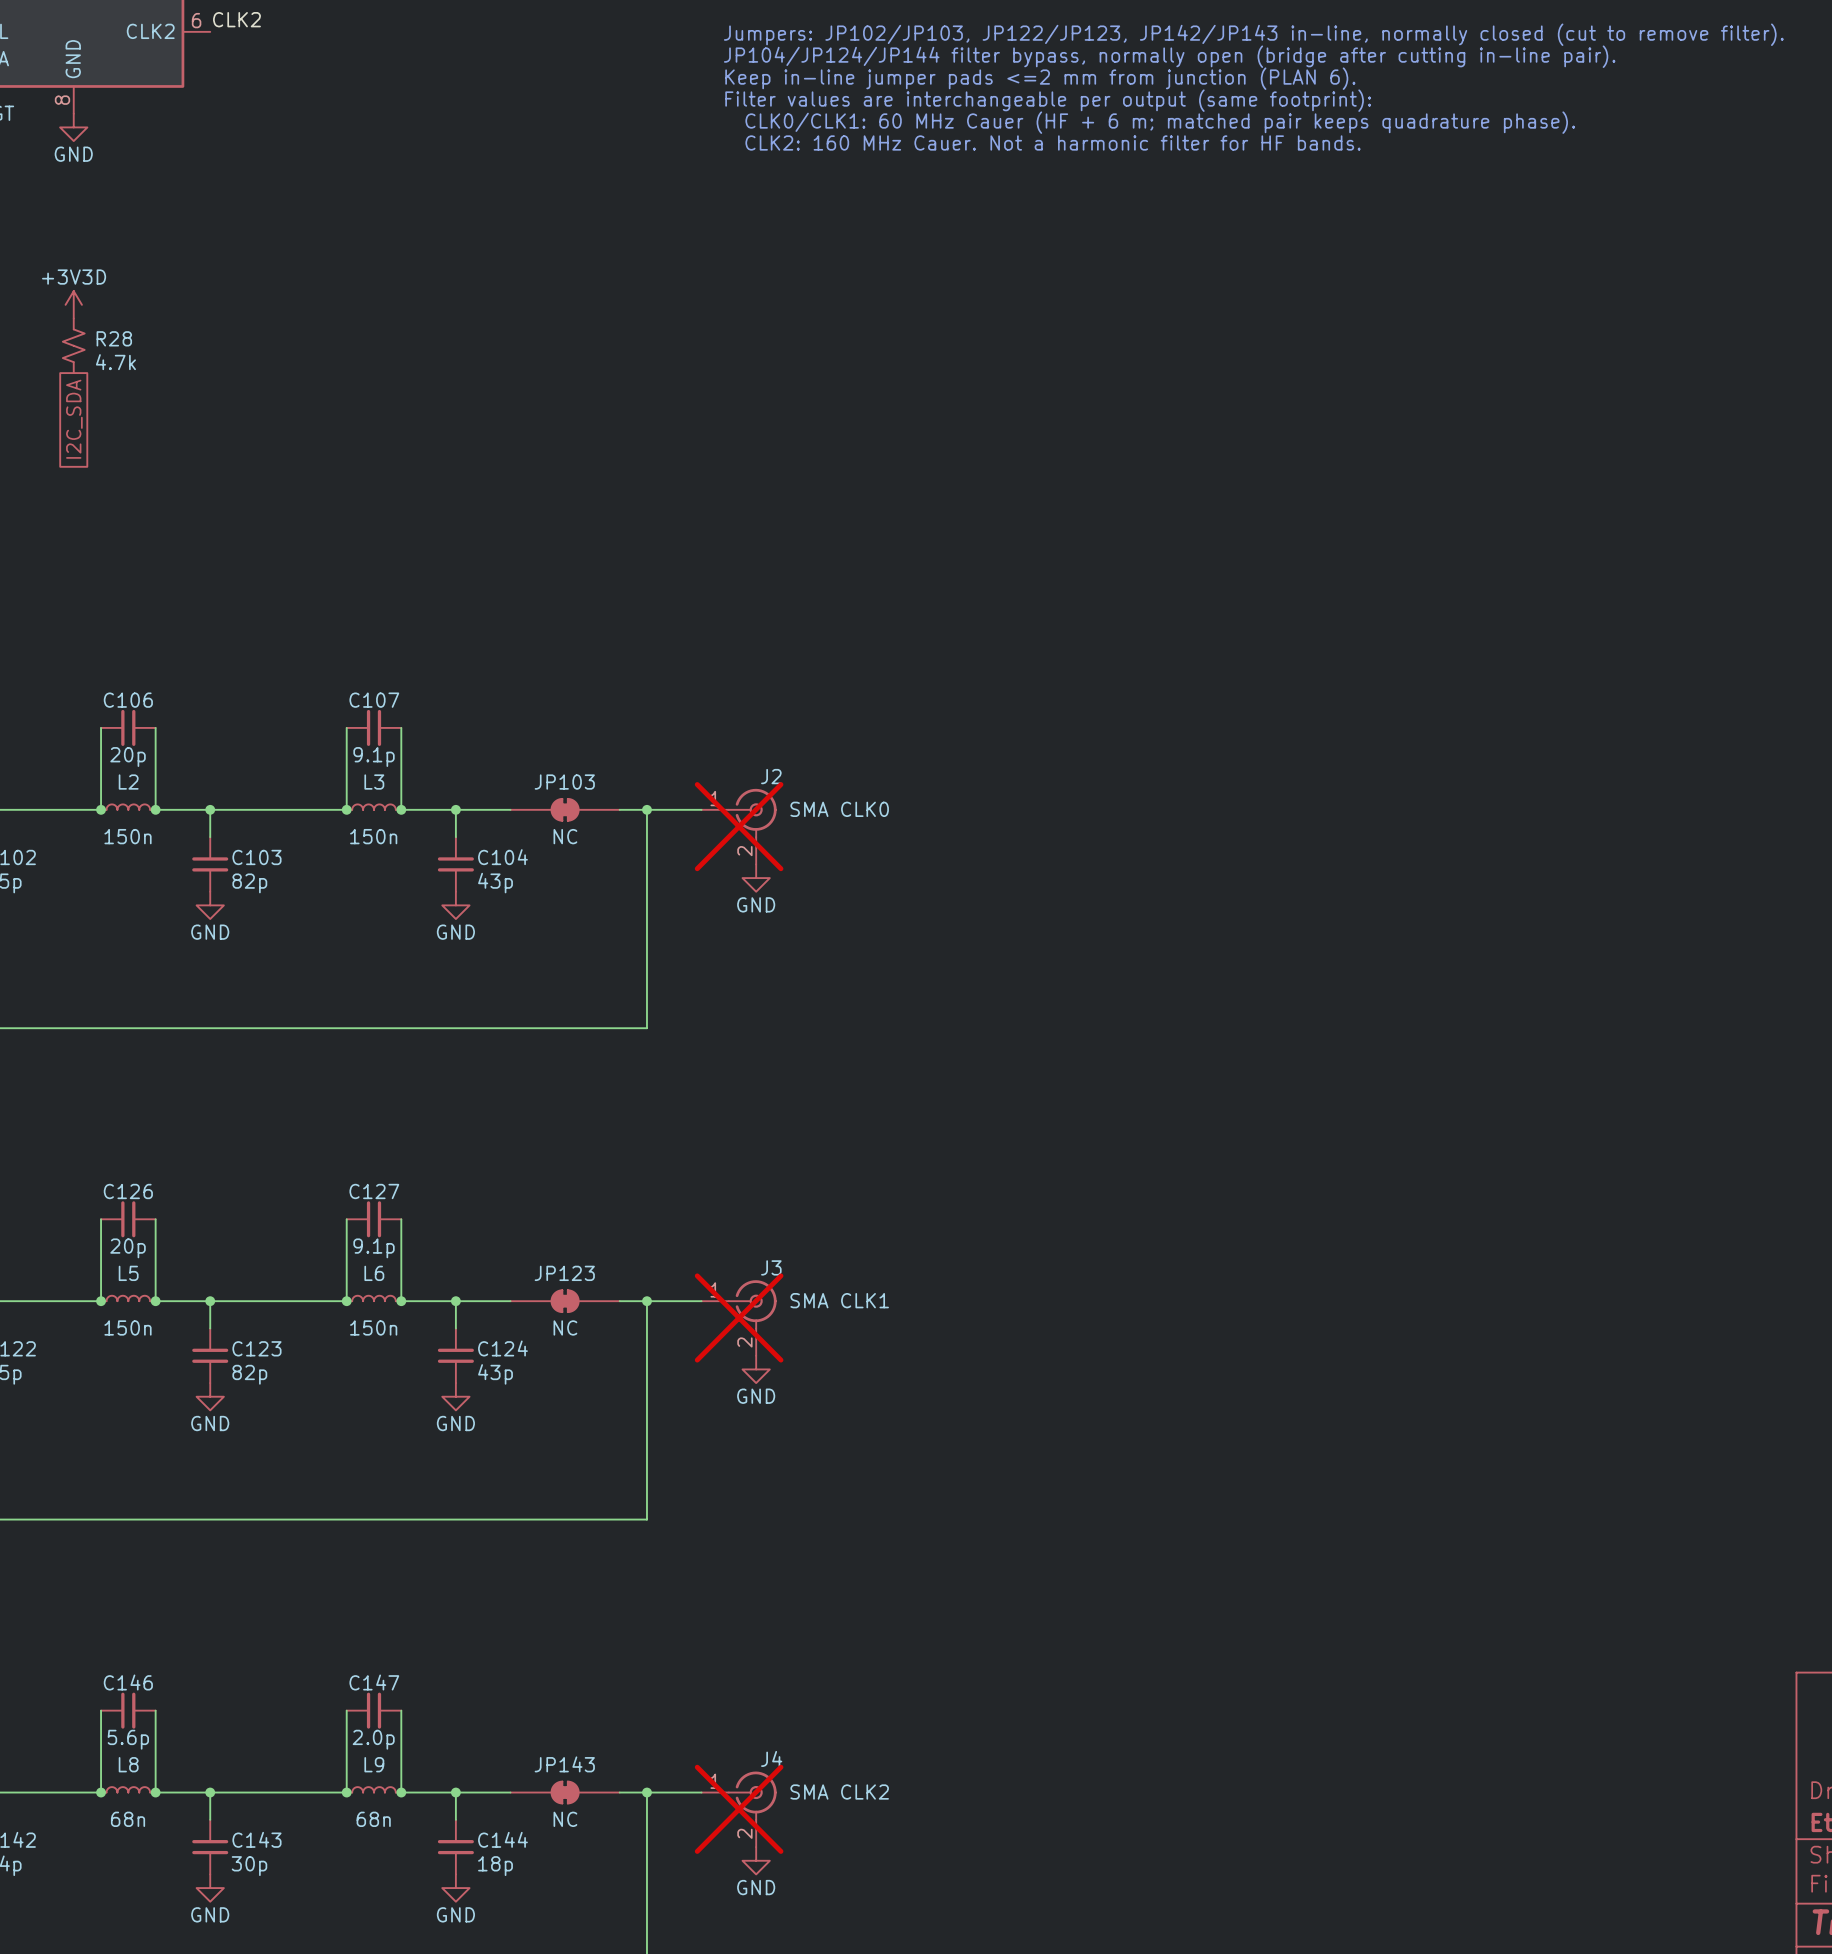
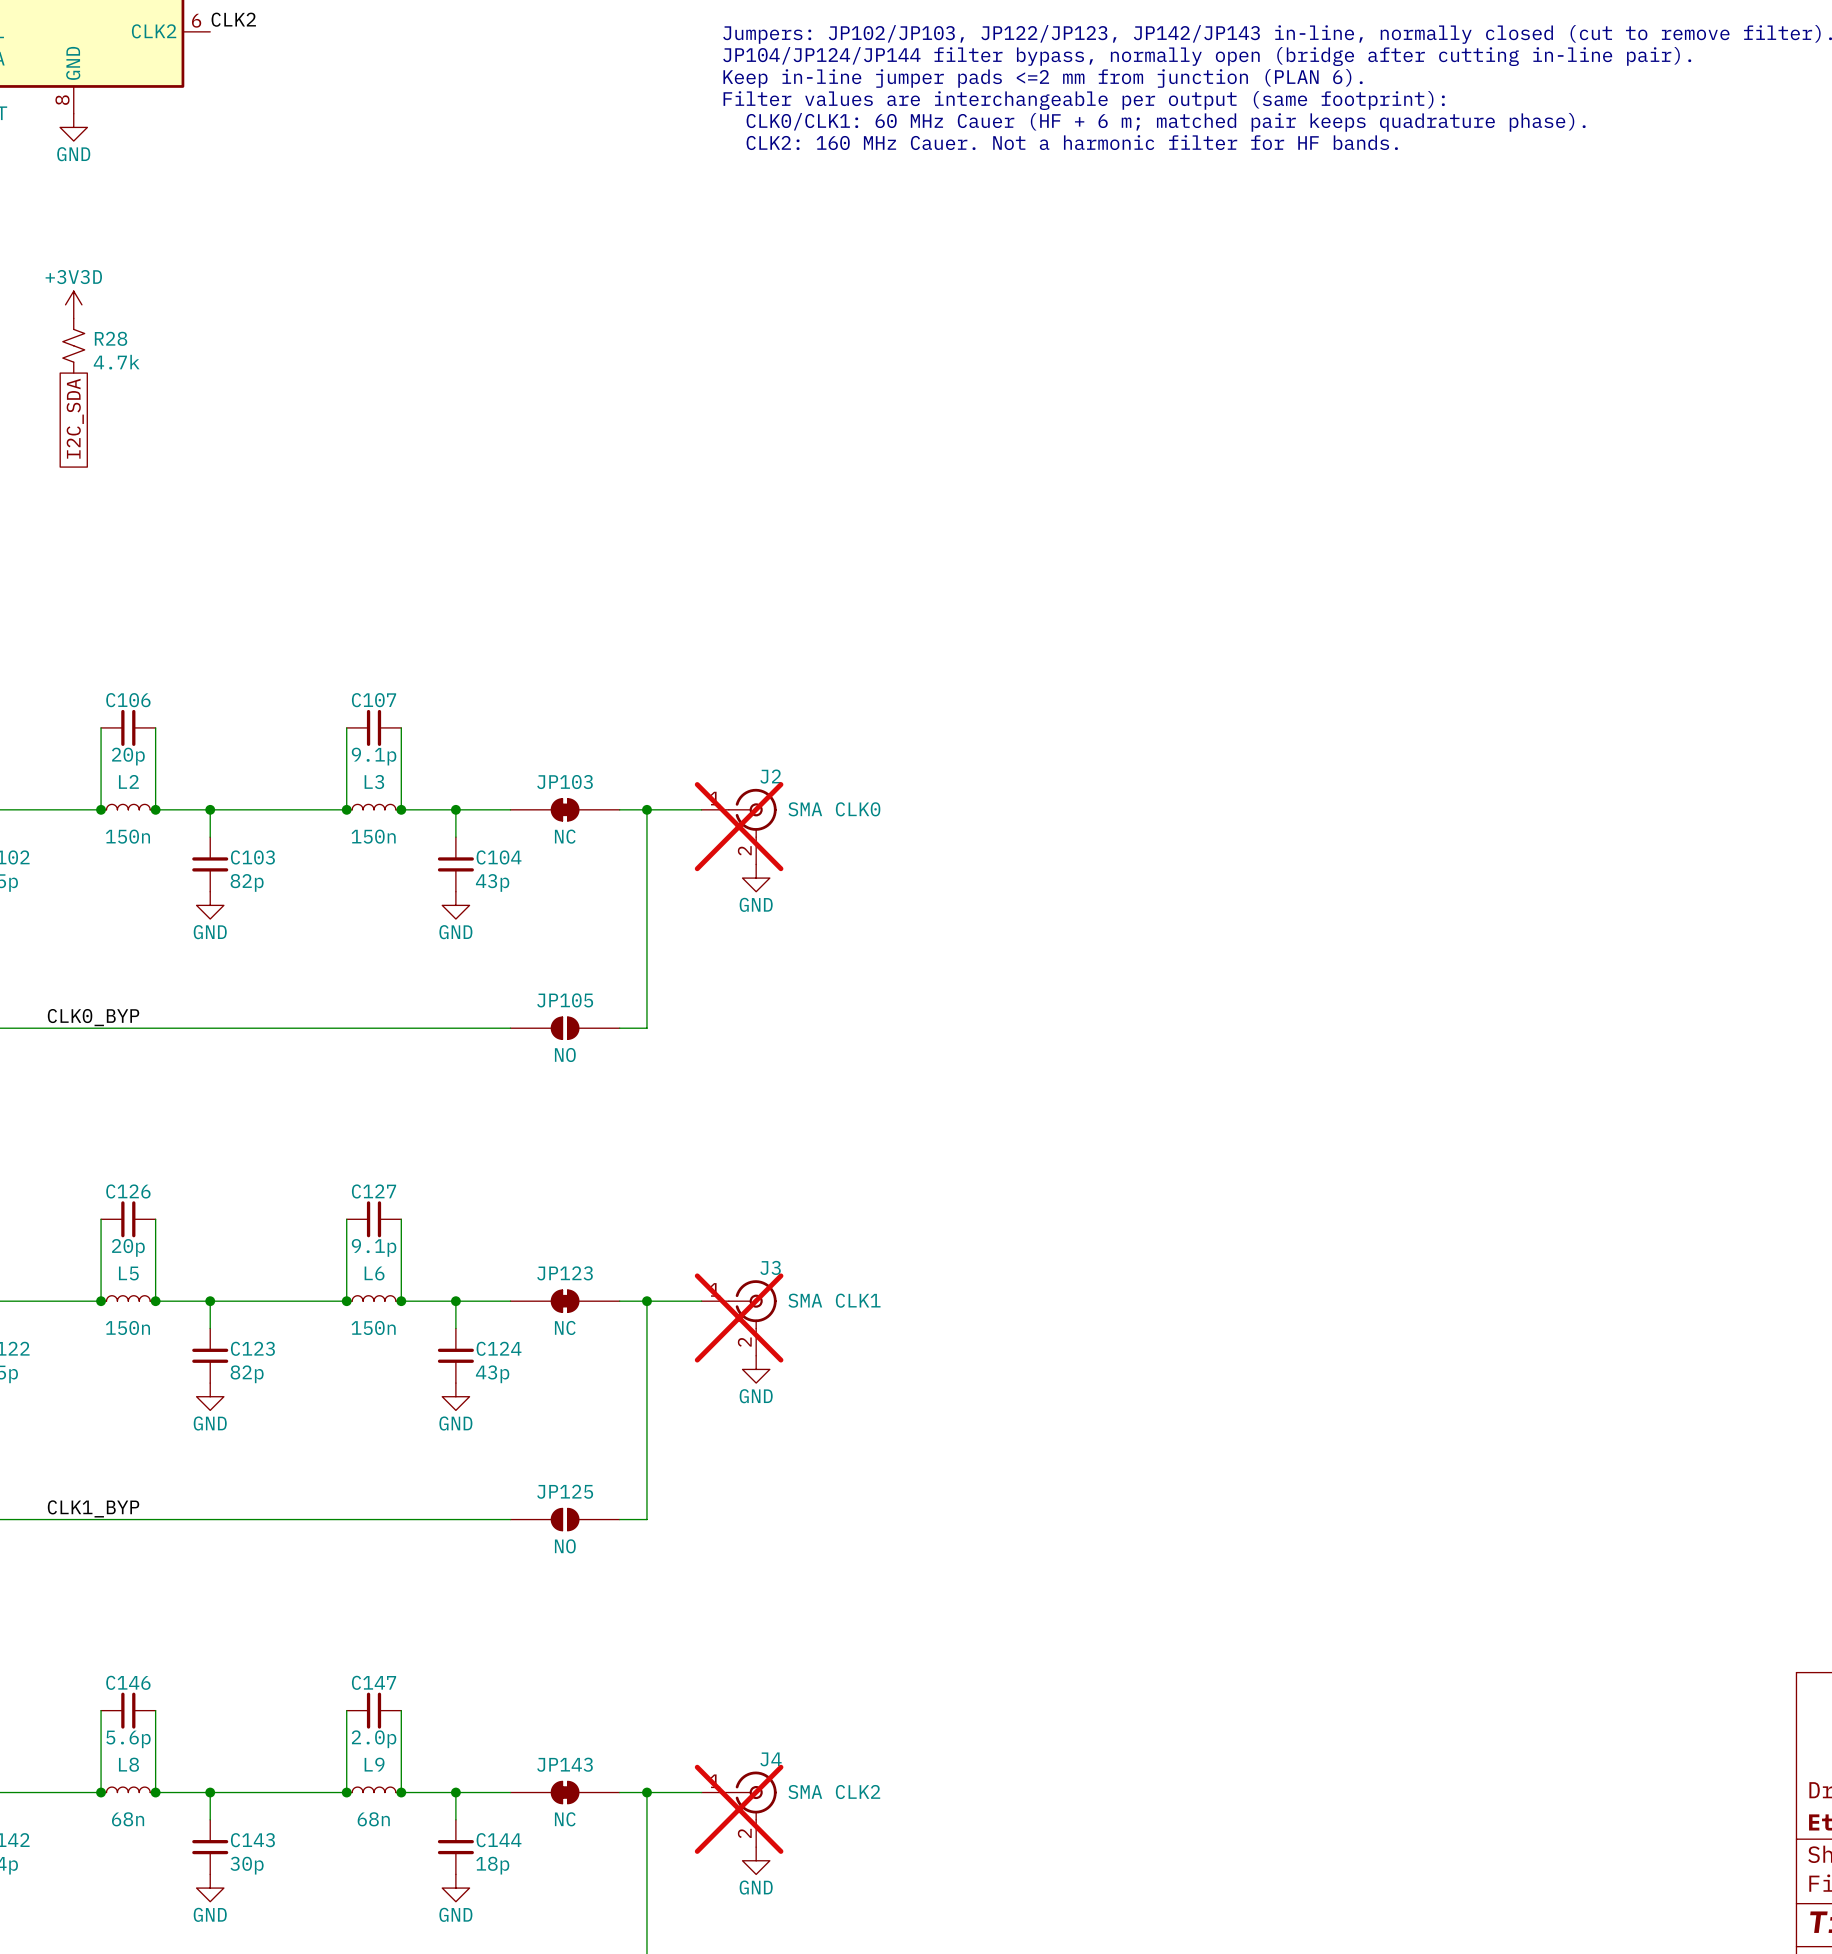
label: none -> CLK0_BYP (93, 1017)
JP105: none -> NO (565, 1028)
label: none -> CLK1_BYP (93, 1508)
JP125: none -> NO (565, 1519)

